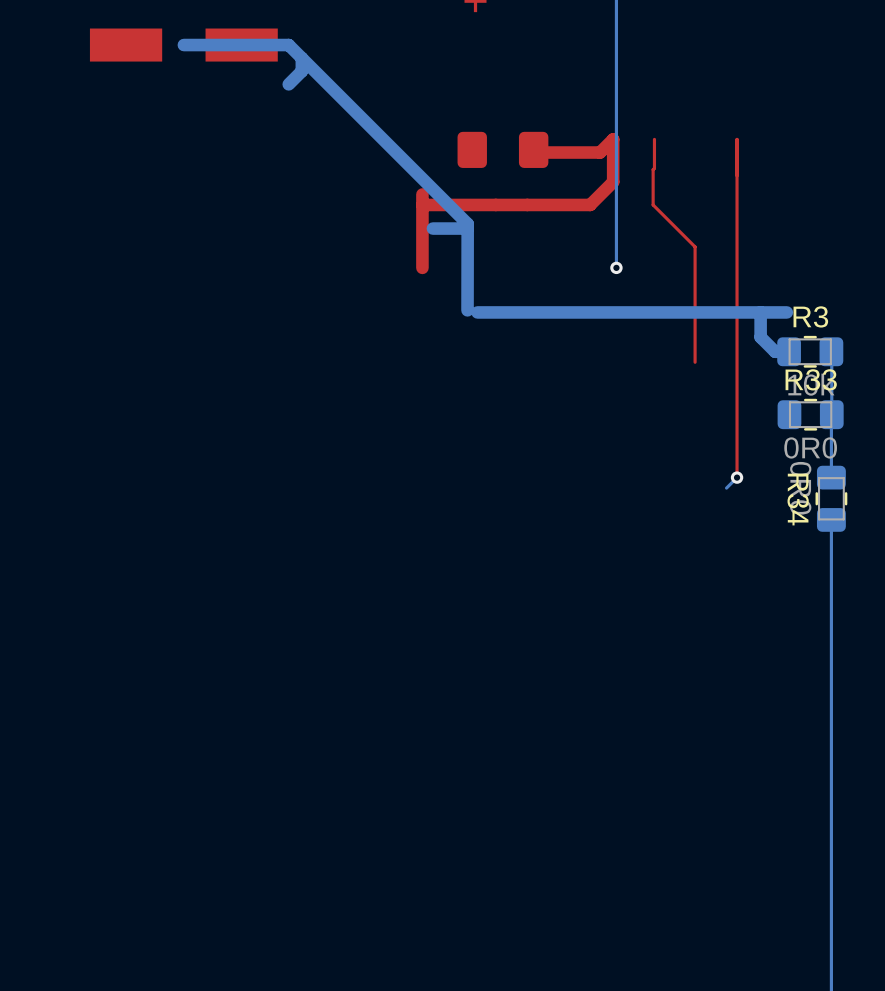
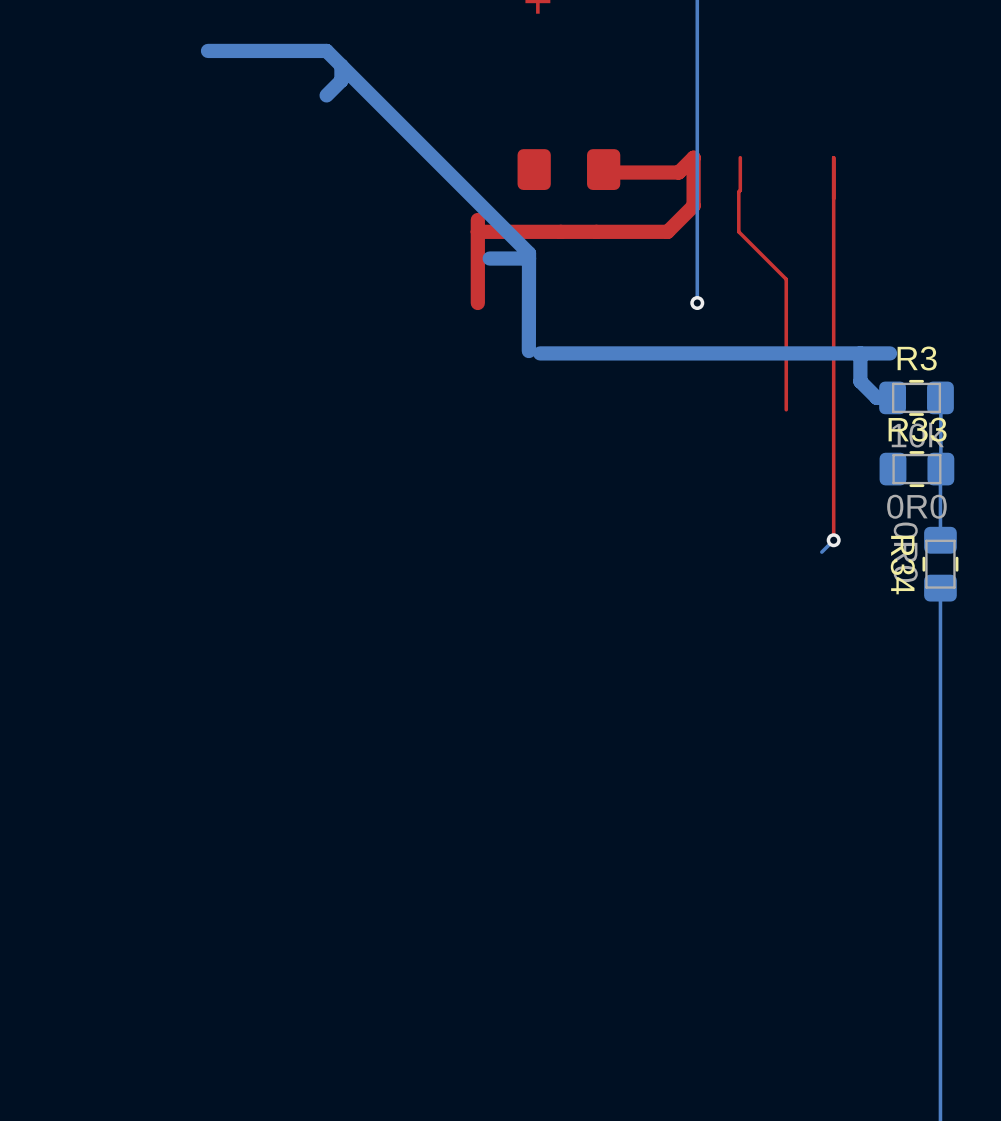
part: (183, 45) -> none

